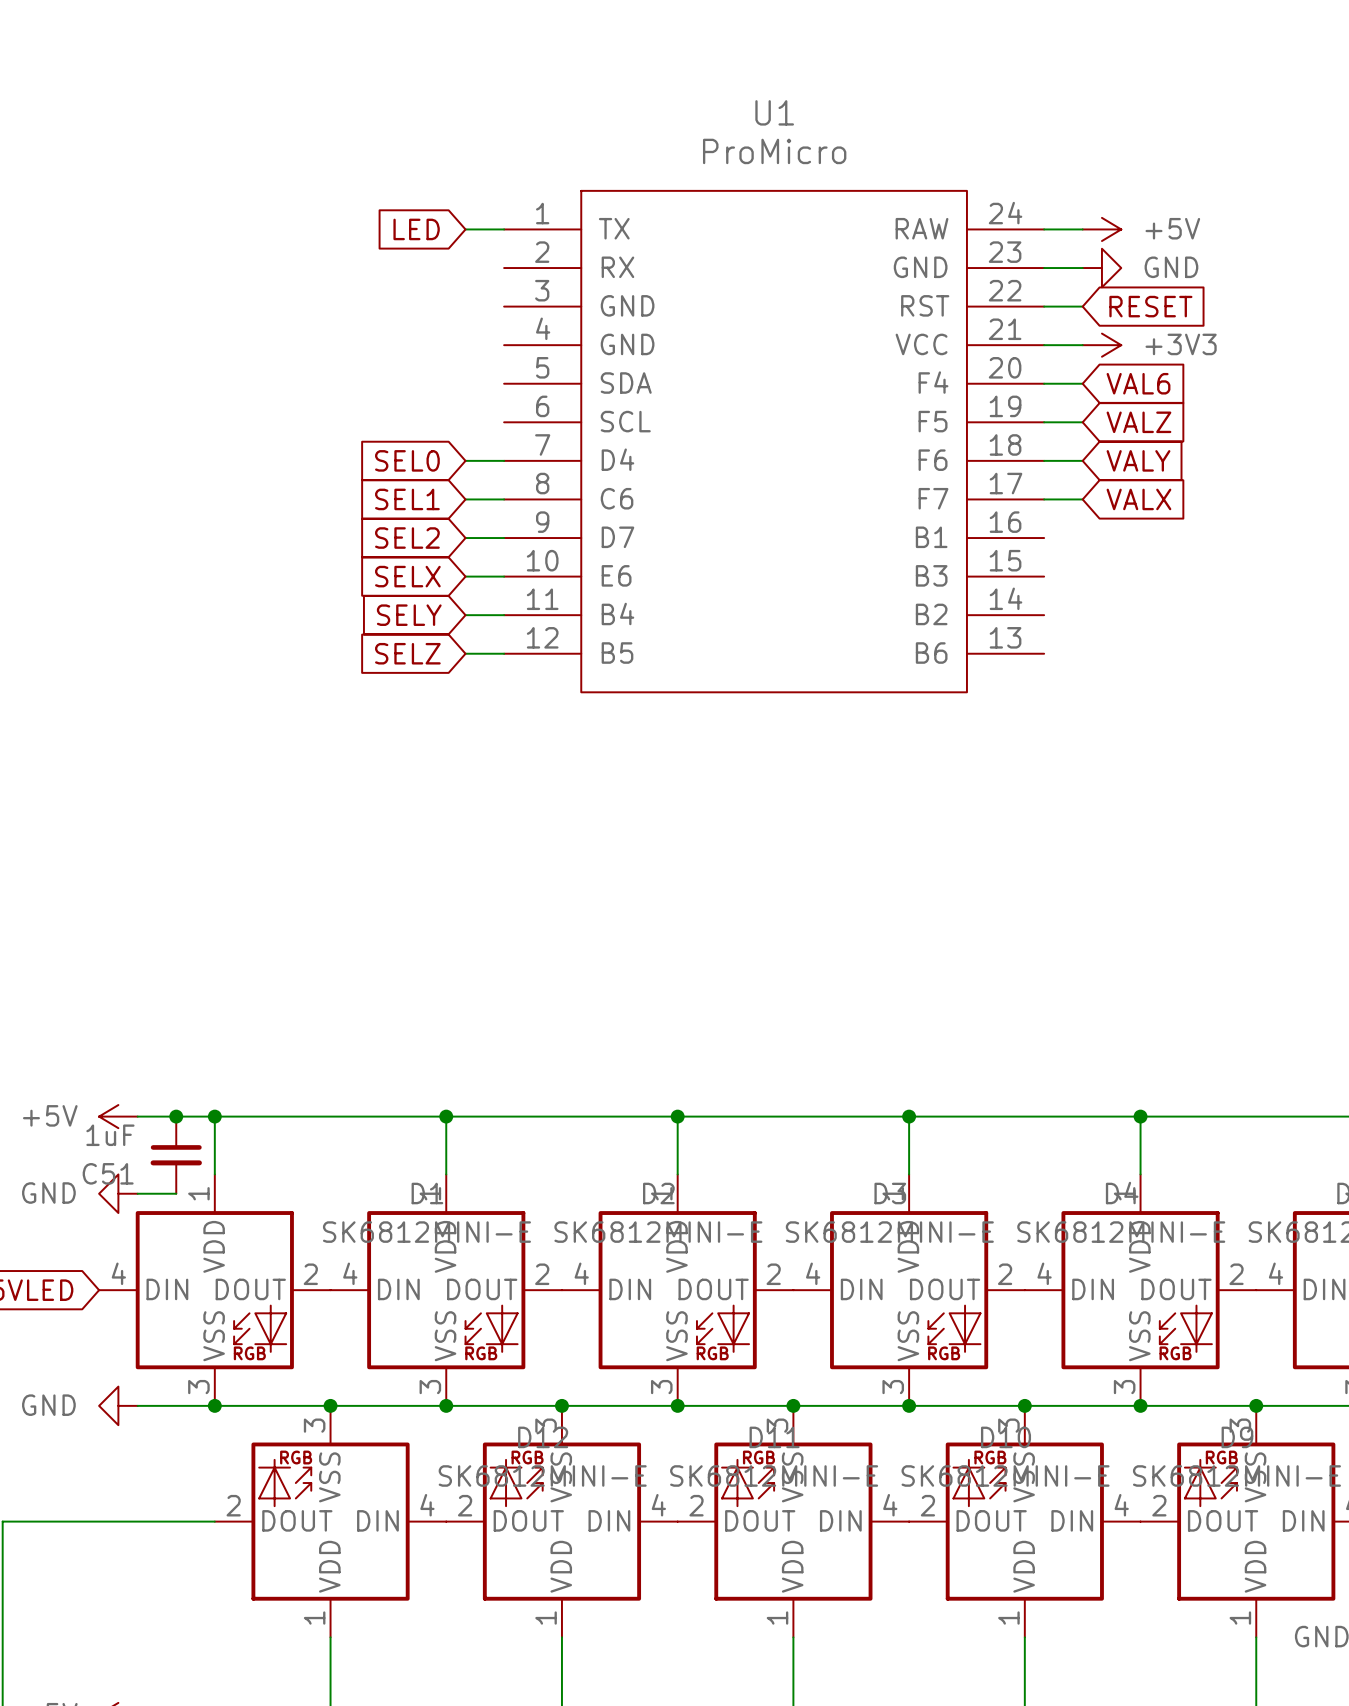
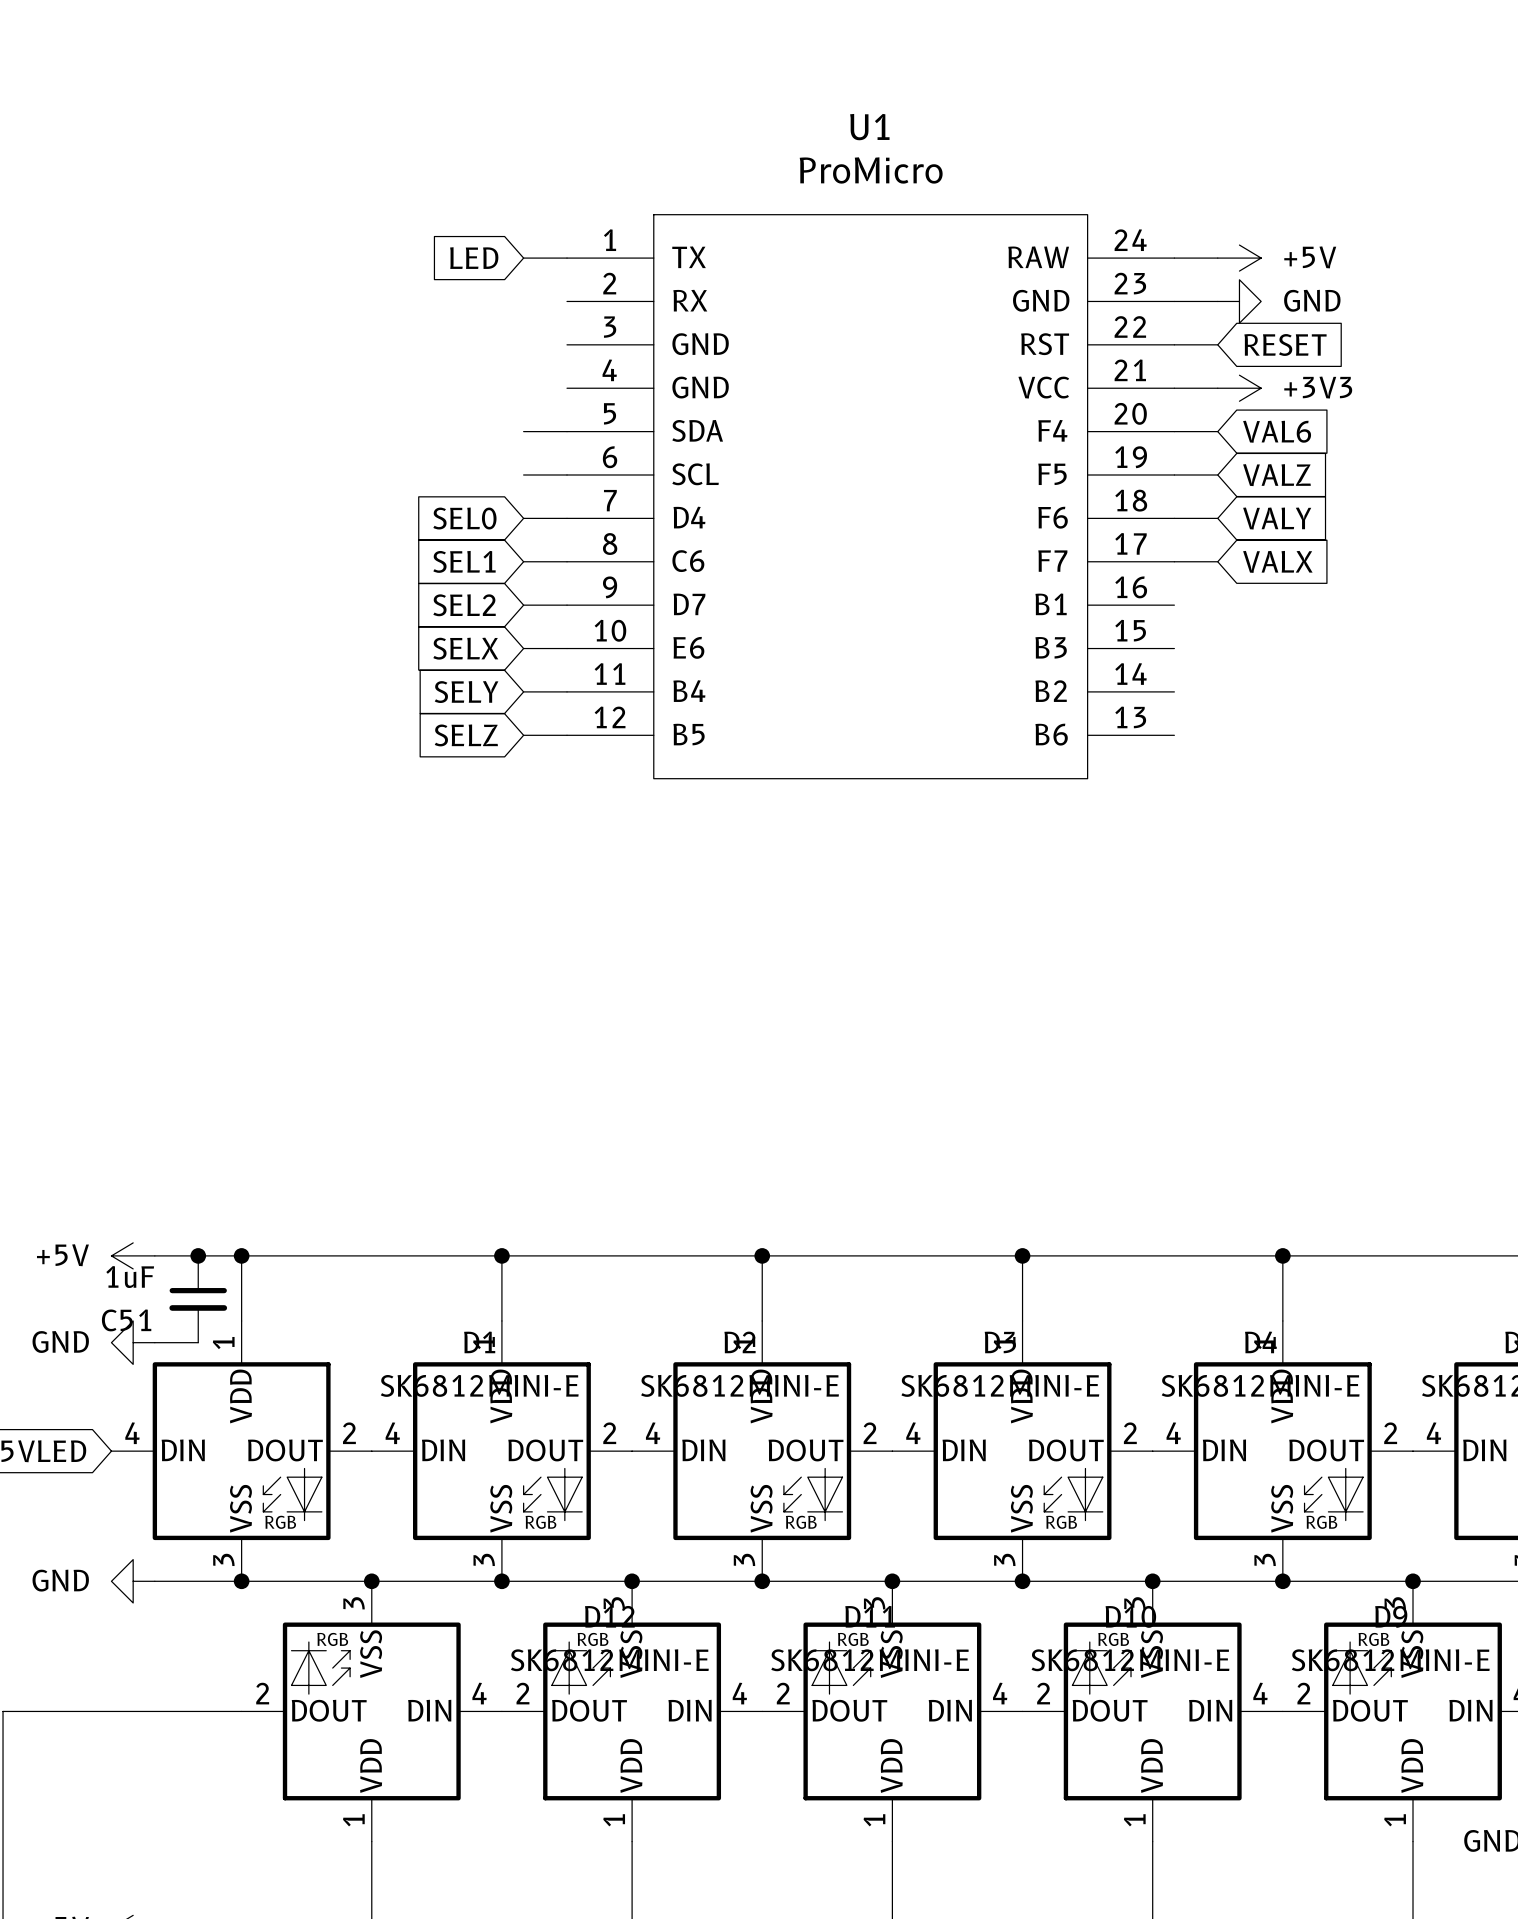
wire: none -> (523, 431) (567, 431)
wire: none -> (523, 475) (567, 475)

